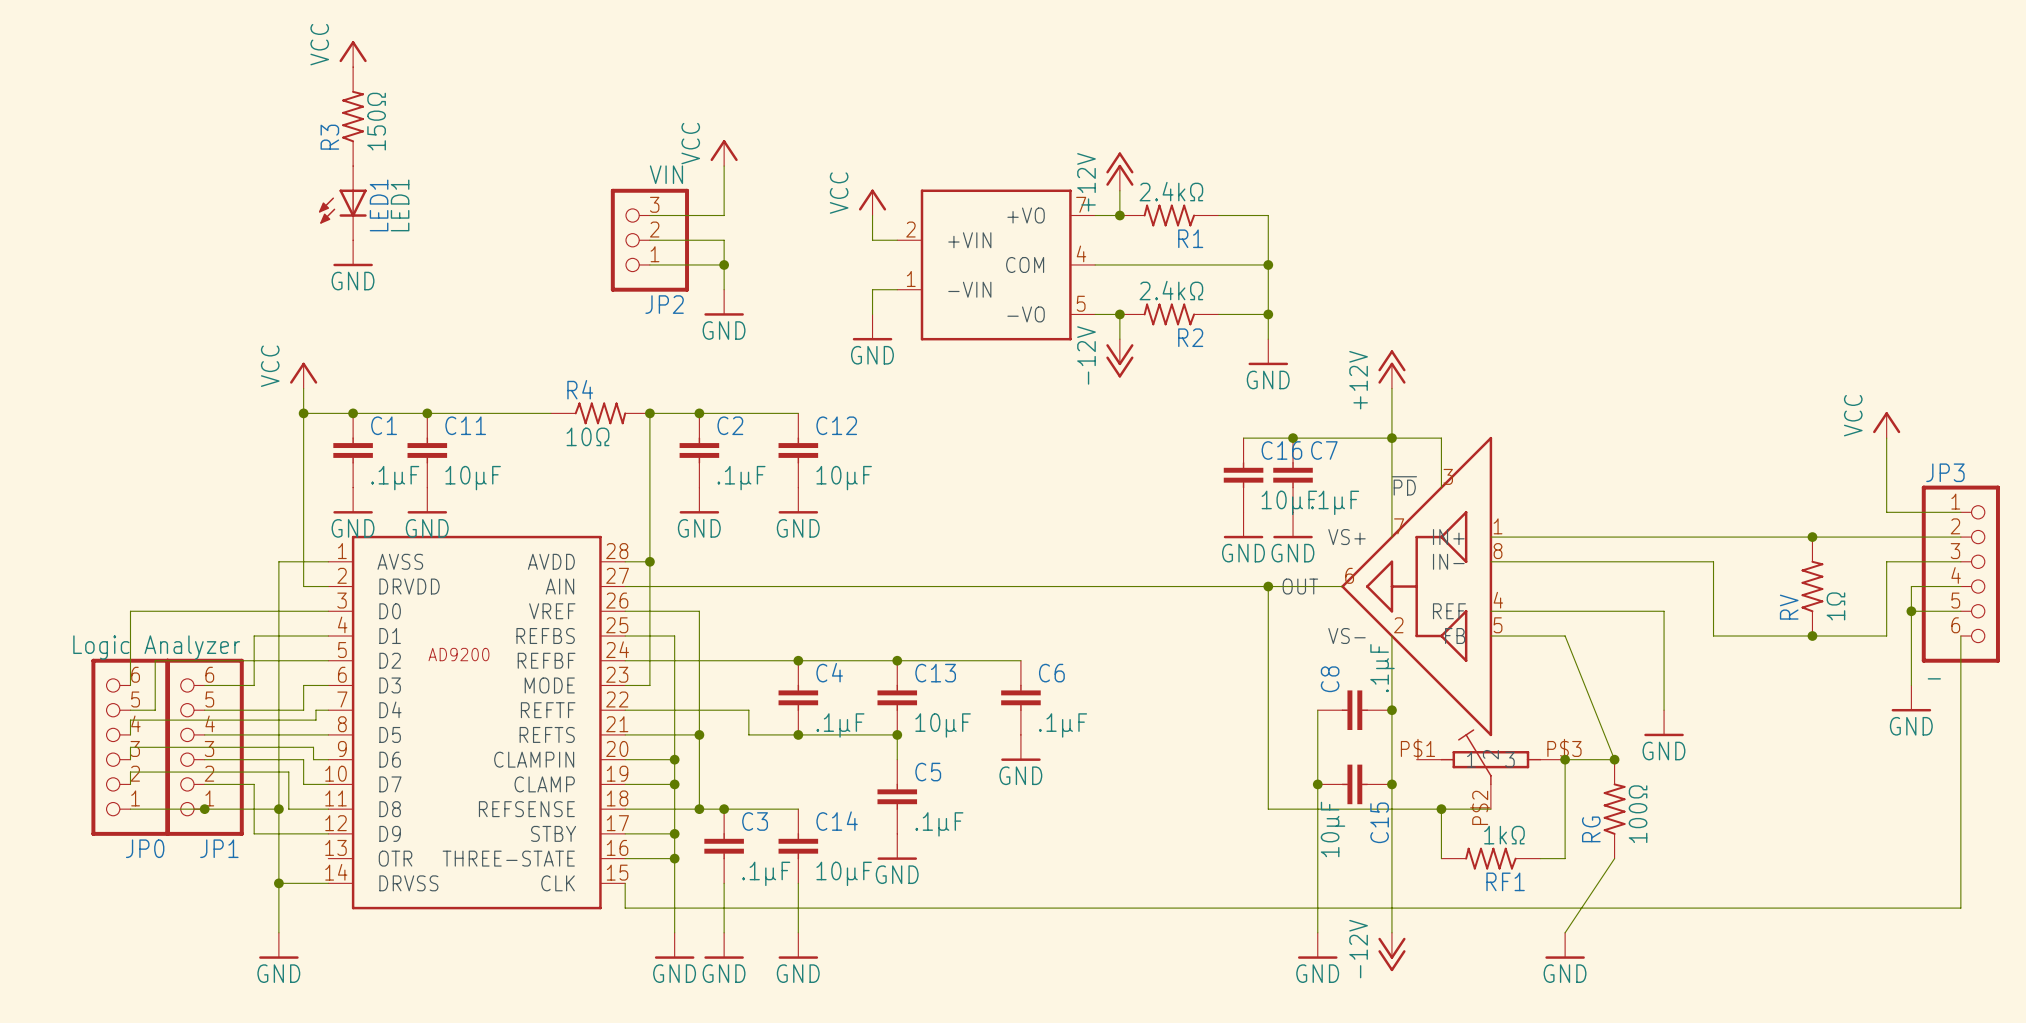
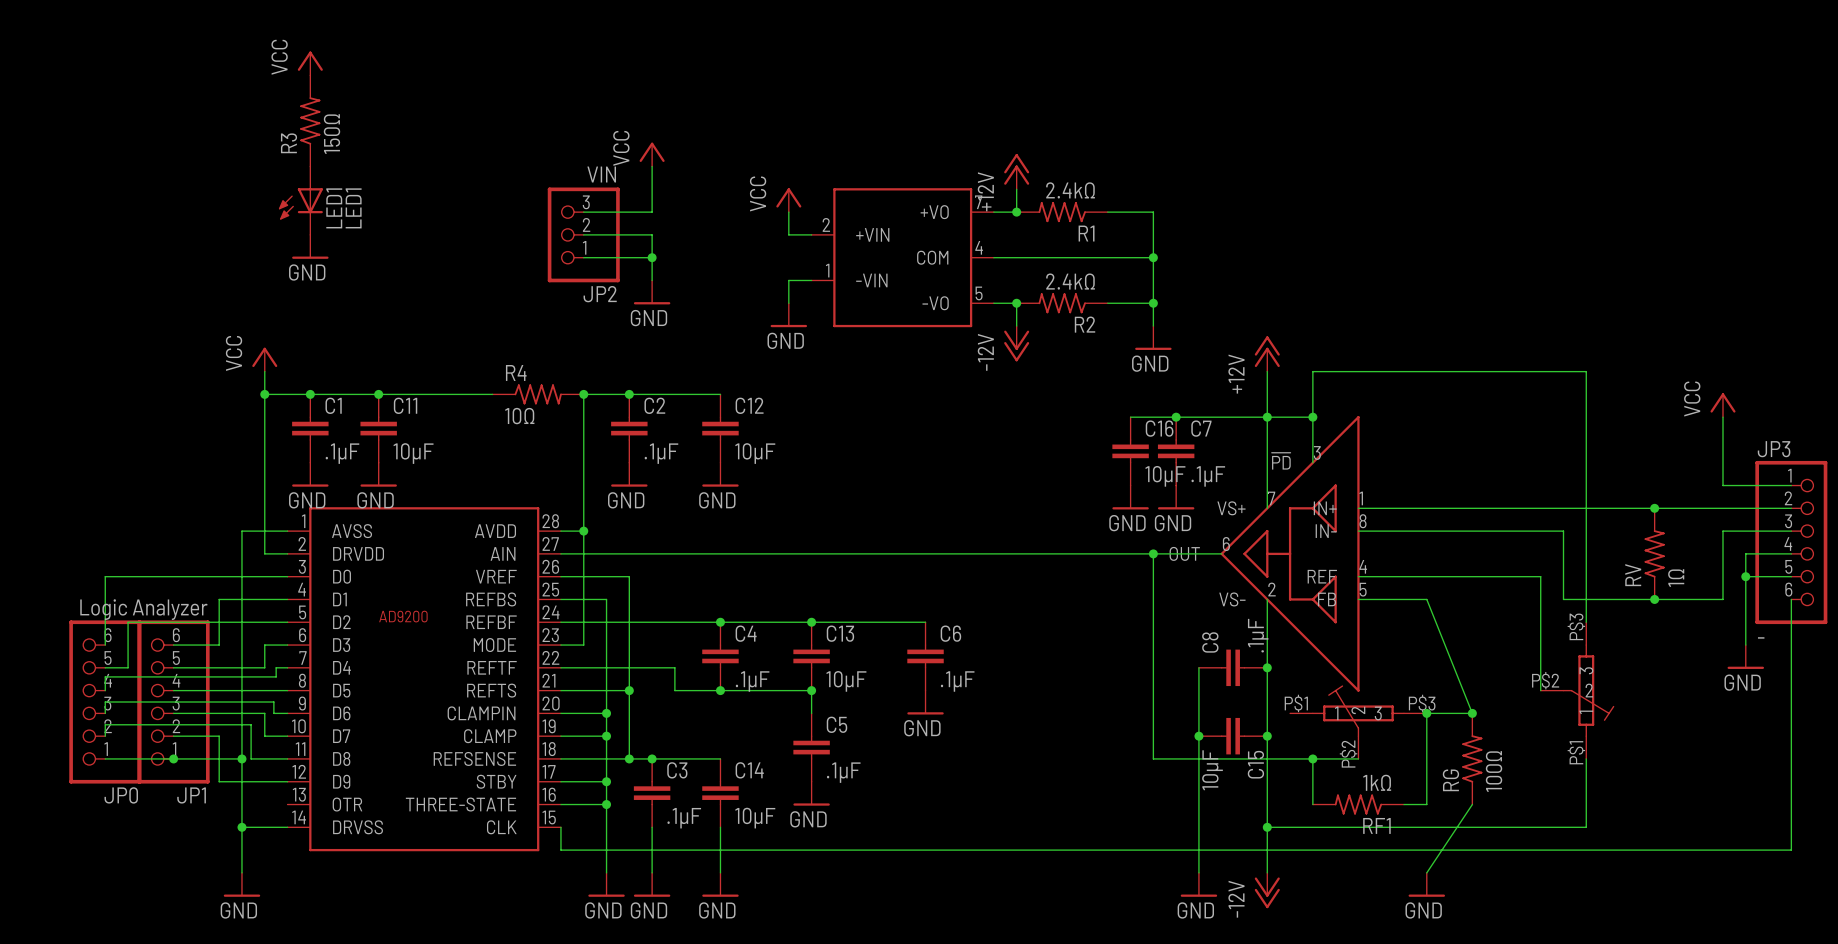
wire: none -> (1312, 417) (1312, 371) (1586, 371) (1586, 622)
junction: none -> (1312, 417)
wire: (1664, 611) (1664, 710) -> (1517, 576) (1540, 576) (1540, 690)
power symbol: GND (1664, 723) -> none
part: none -> (1577, 690)
wire: none -> (1586, 758) (1586, 827) (1267, 827)
junction: none -> (1267, 827)

